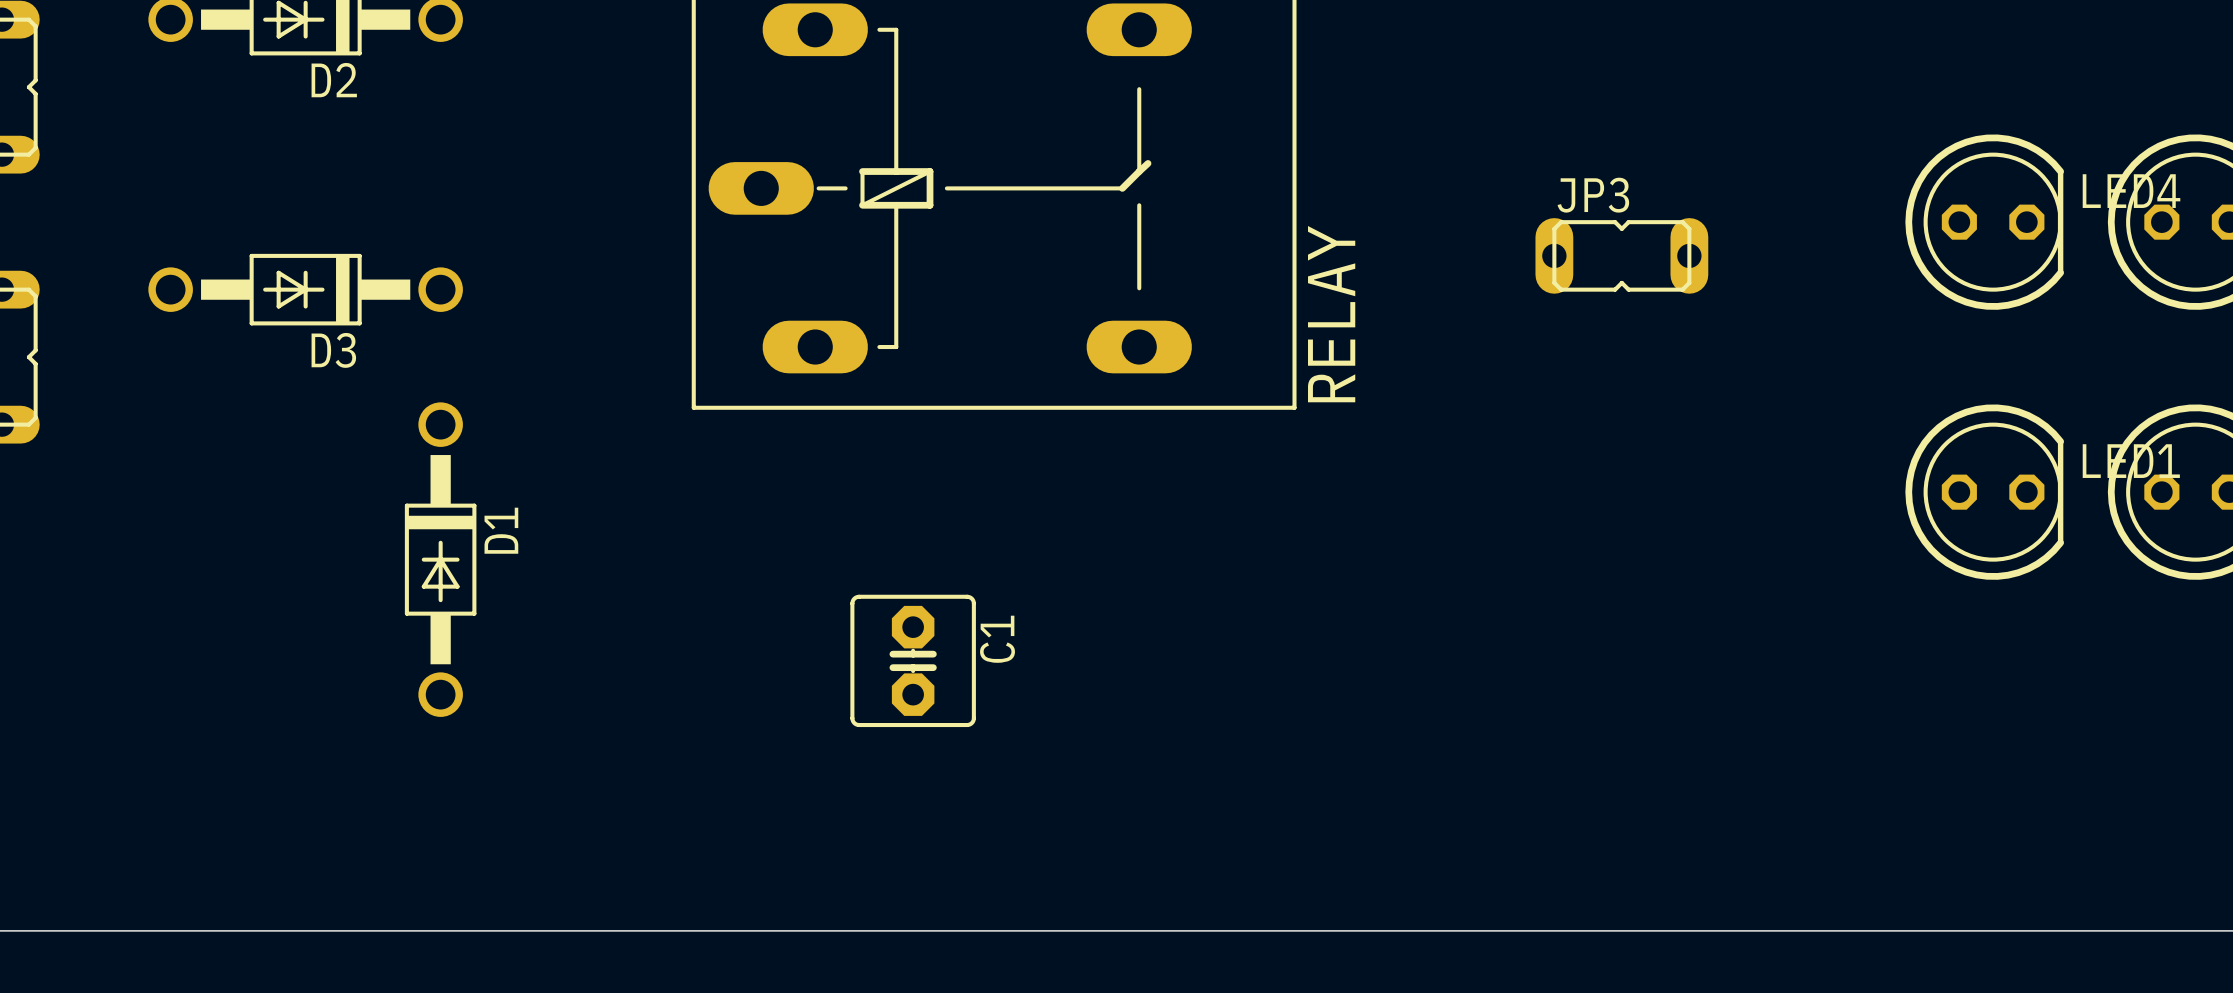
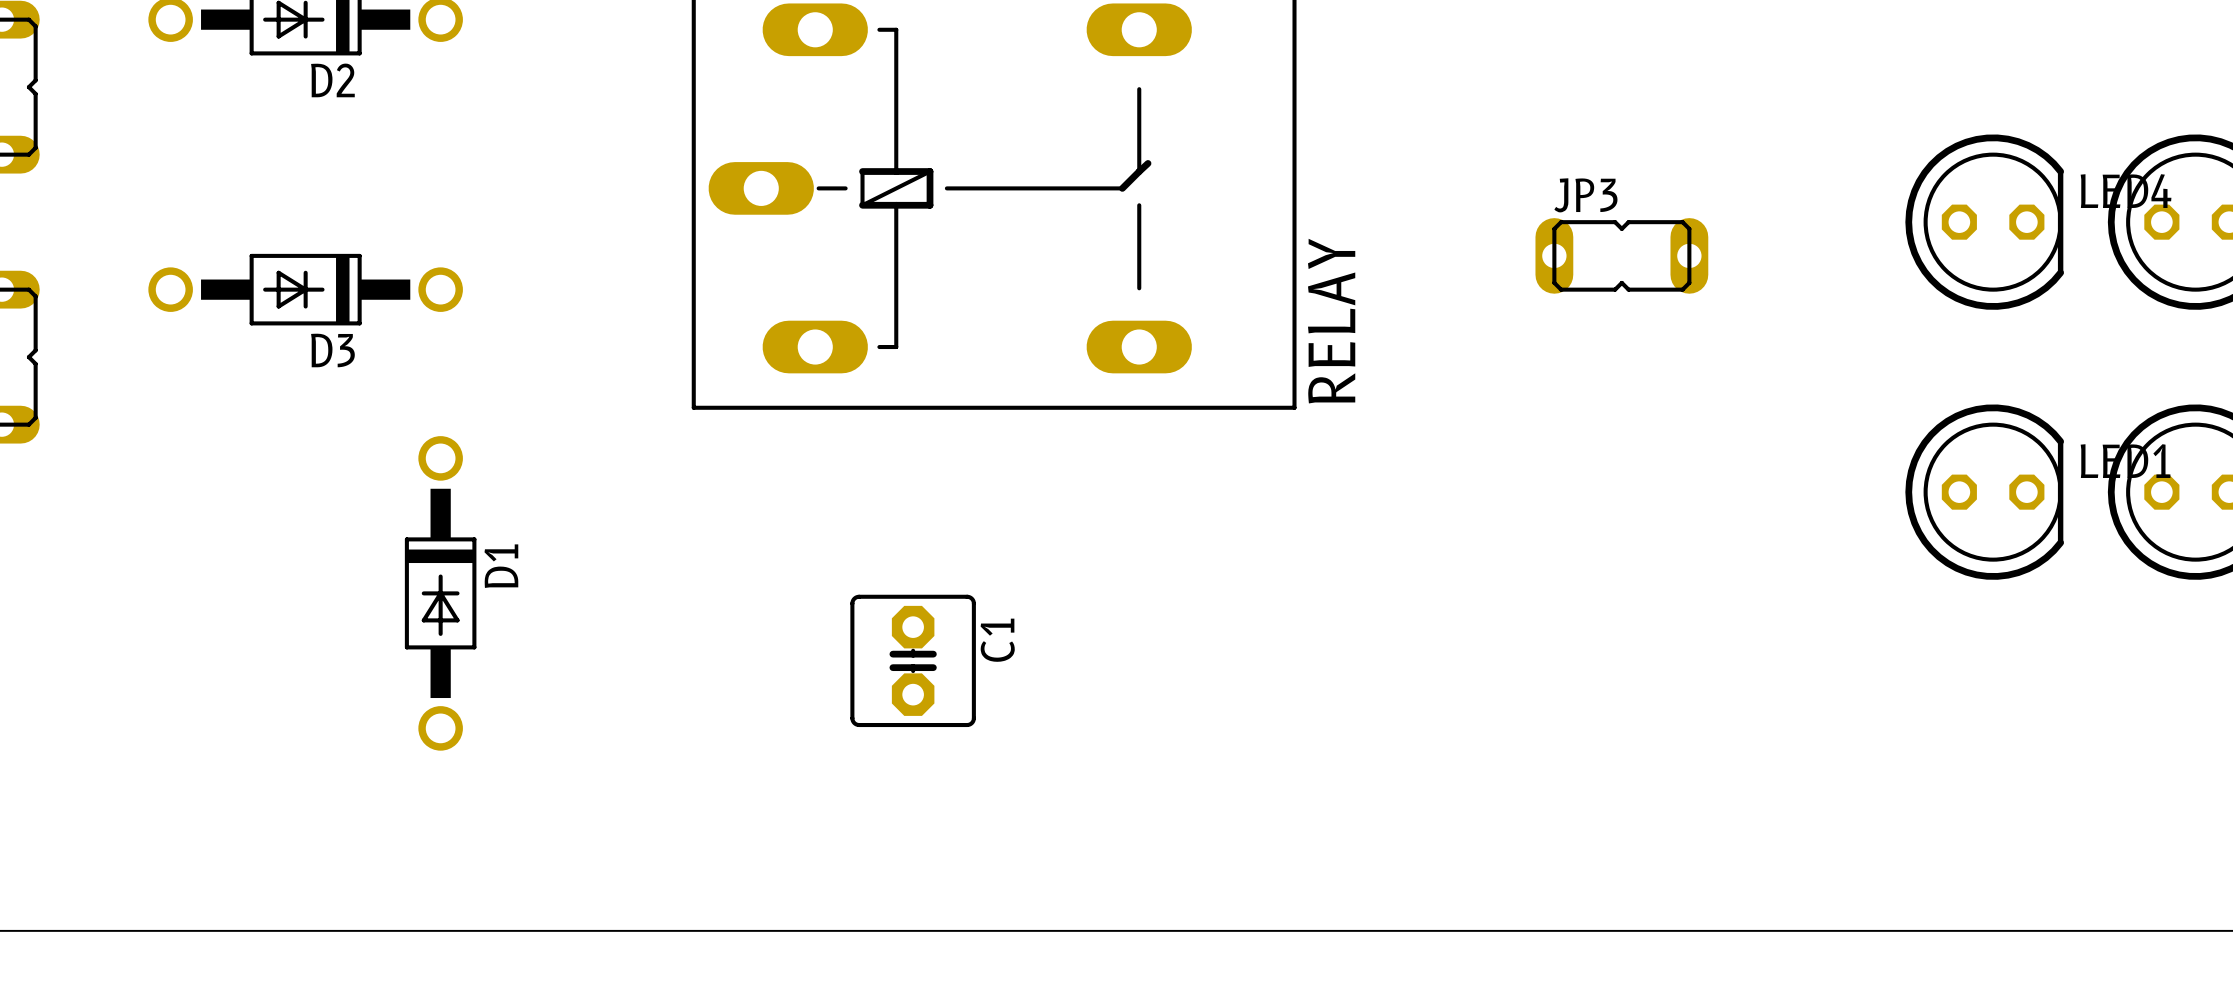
D1 position: (440, 559) -> (440, 593)

